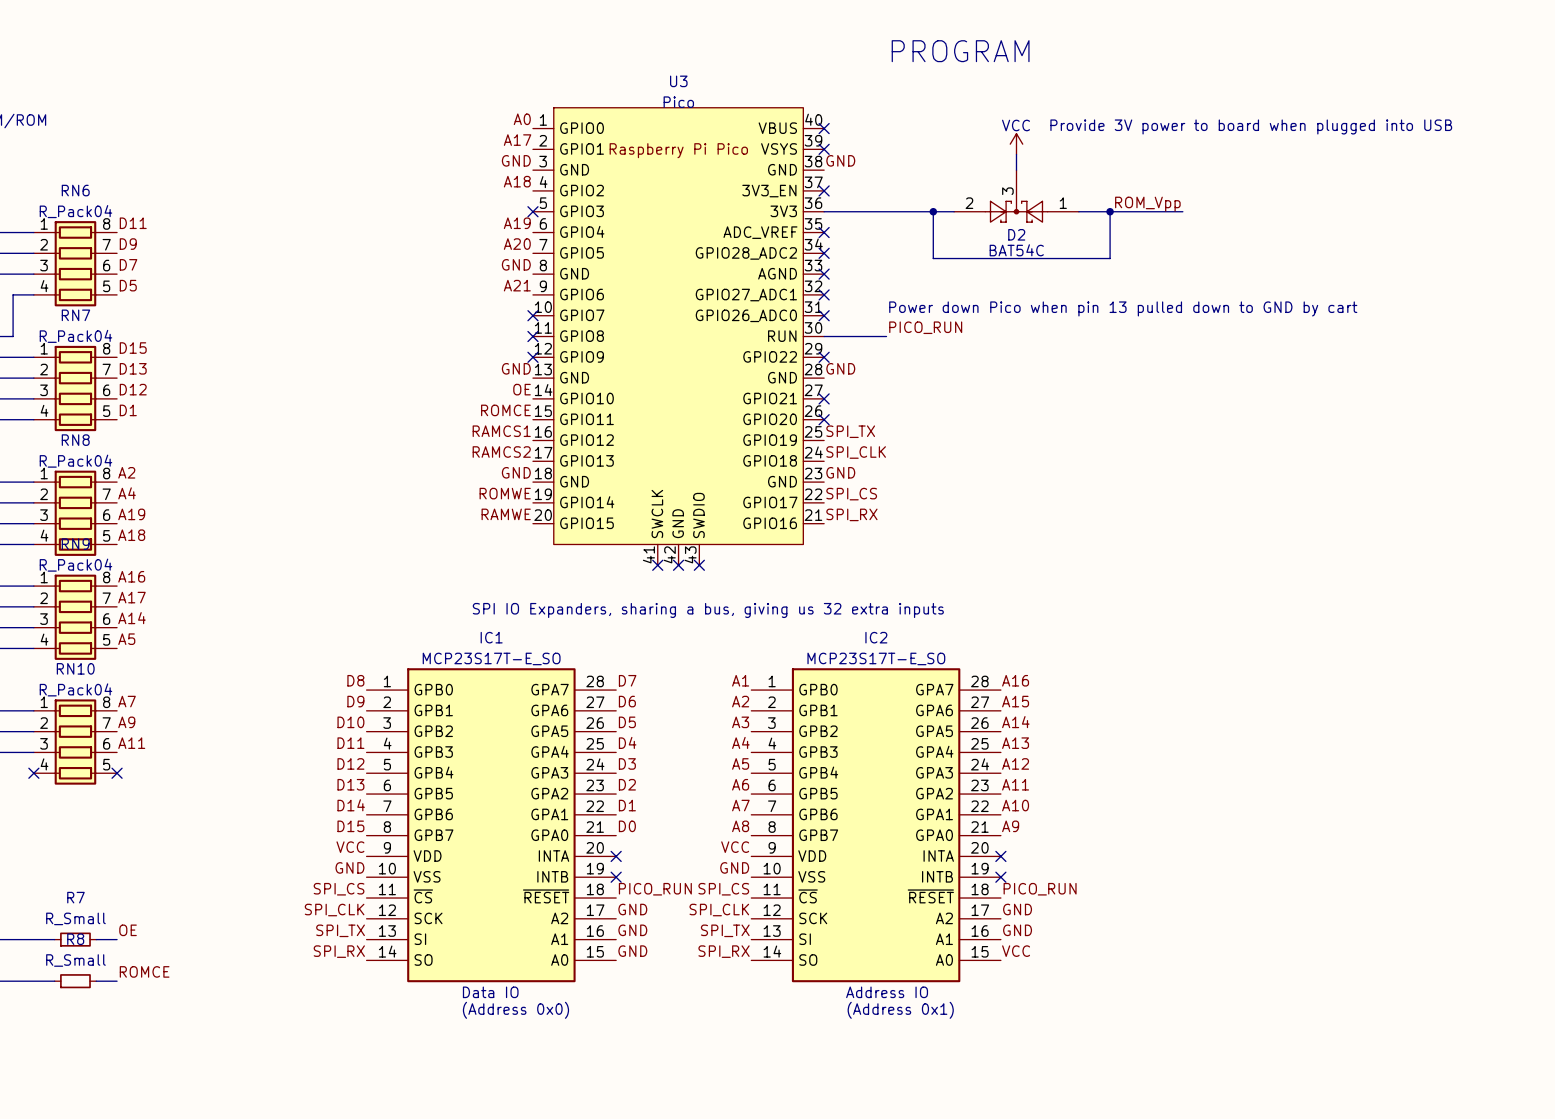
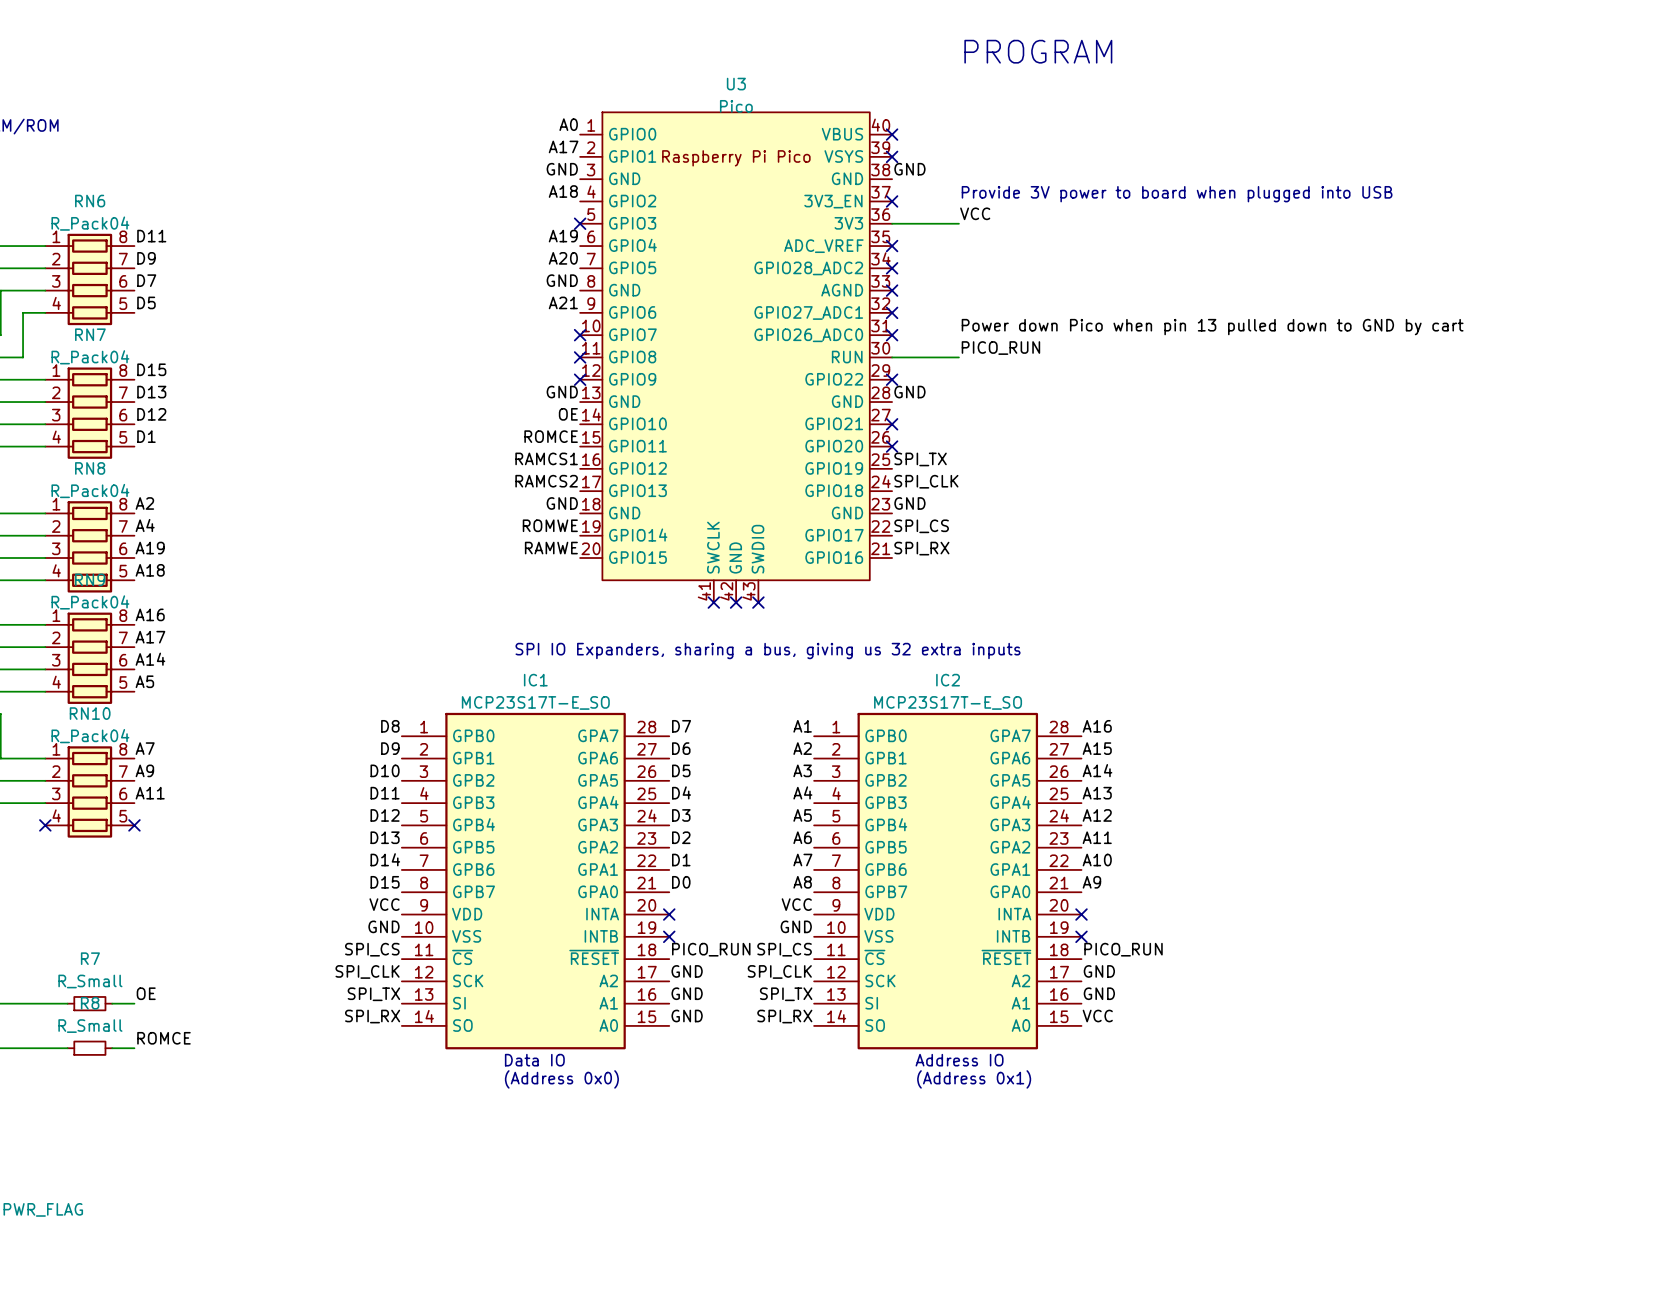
text position: Provide 3V power to board when plugged into USB (1251, 126) -> Provide 3V power to board when plugged into USB (1177, 194)
power symbol: VCC (1016, 144) -> none
wire: (1016, 154) (1016, 170) -> none
D2: BAT54C (1016, 196) -> none
label: none -> VCC (975, 213)
label: ROM_Vpp (1147, 204) -> none
wire: (886, 211) (954, 211) -> none
wire: (933, 211) (933, 258) (1110, 258) (1110, 211) -> none
junction: (933, 211) -> none
wire: (1078, 211) (1182, 211) -> none
junction: (1110, 211) -> none
text: Power down Pico when pin 13 pulled down to GND by cart (1123, 308) -> none
label: none -> Power down Pico when pin 13 pulled down to GND by cart (1212, 327)

